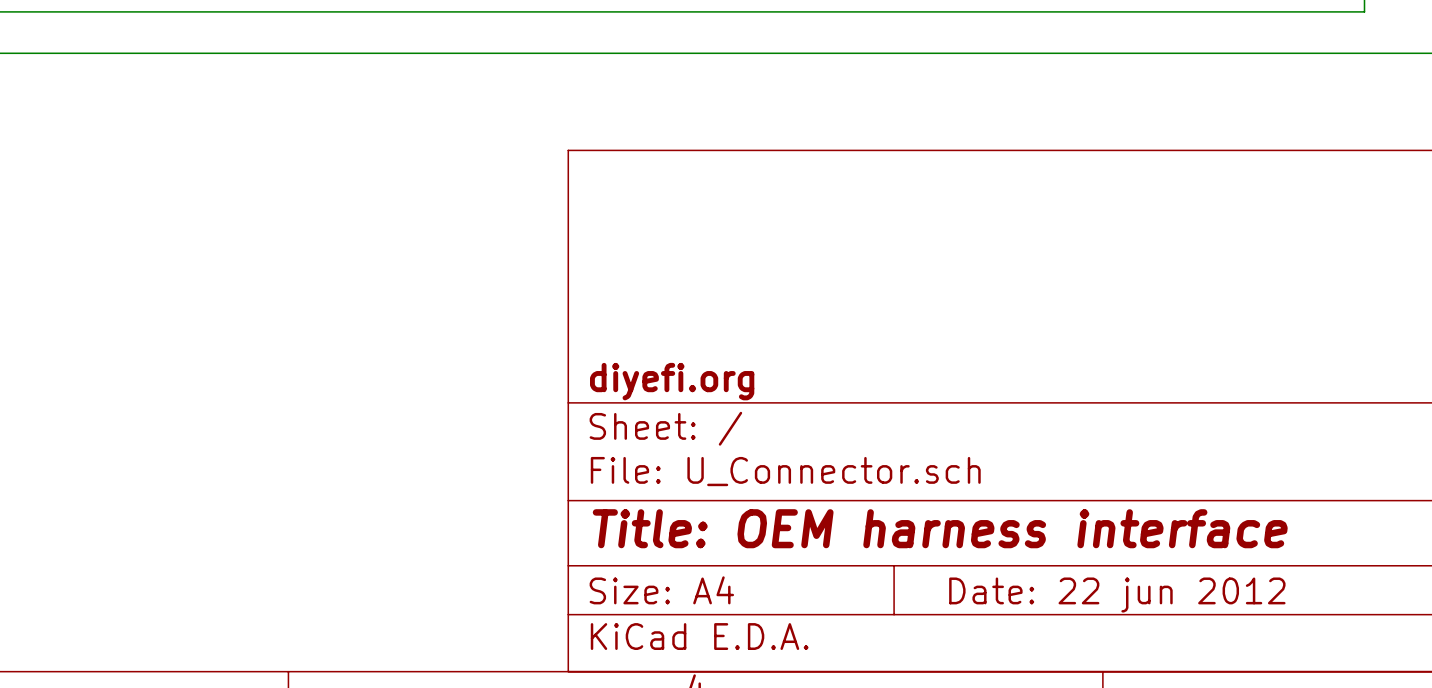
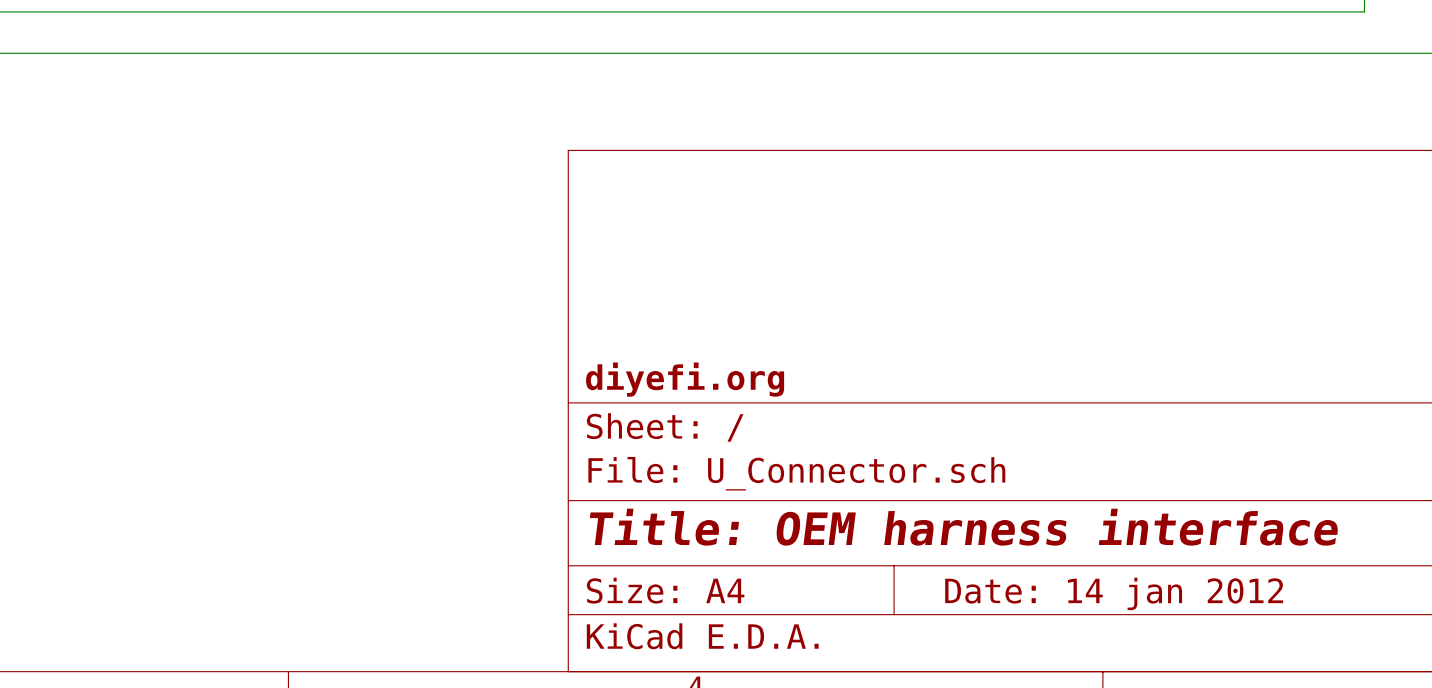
title block: Date: 22 jun 2012 (1117, 595) -> Date: 14 jan 2012 (1114, 593)

